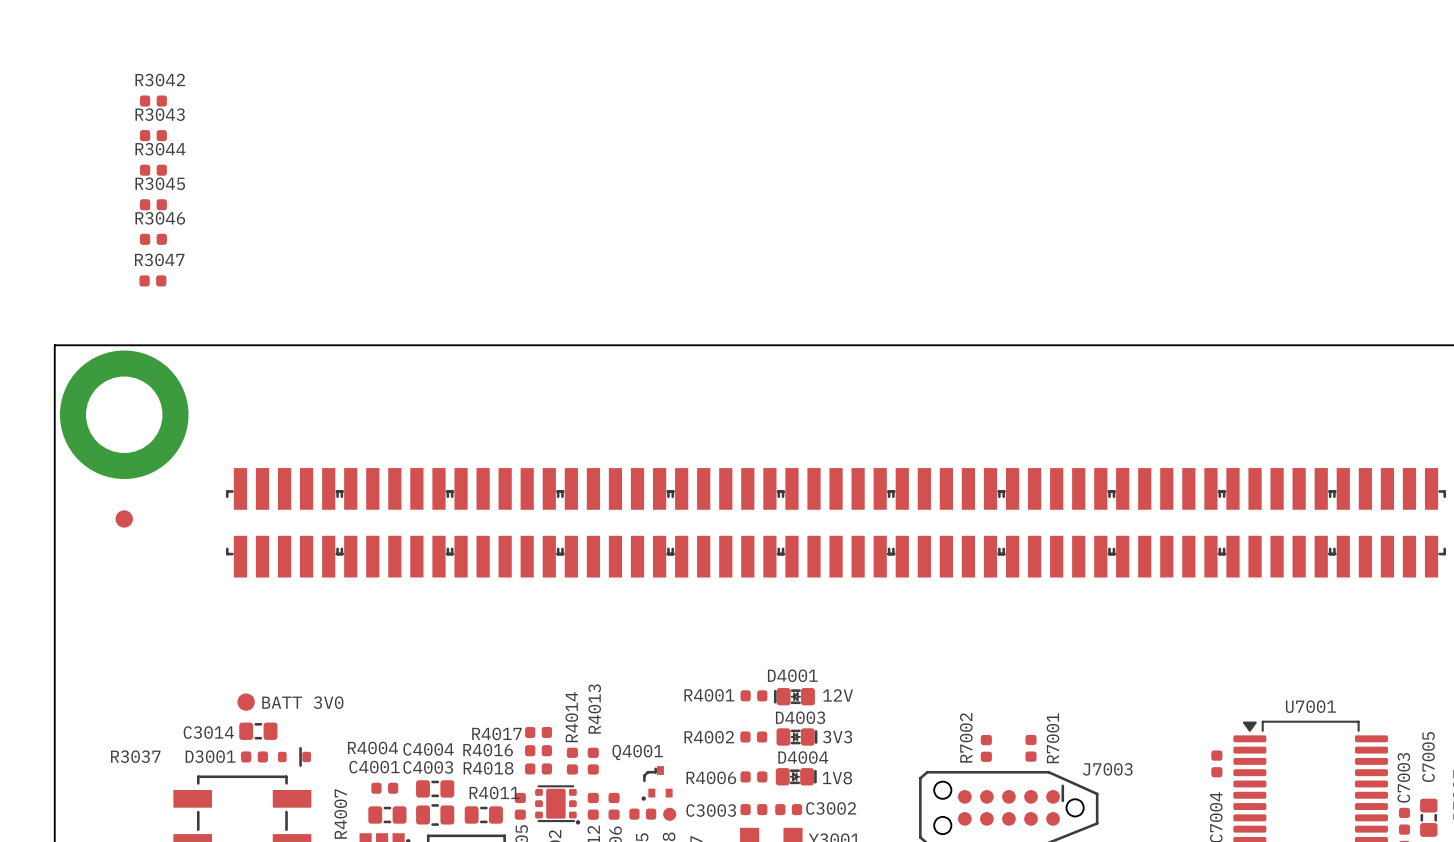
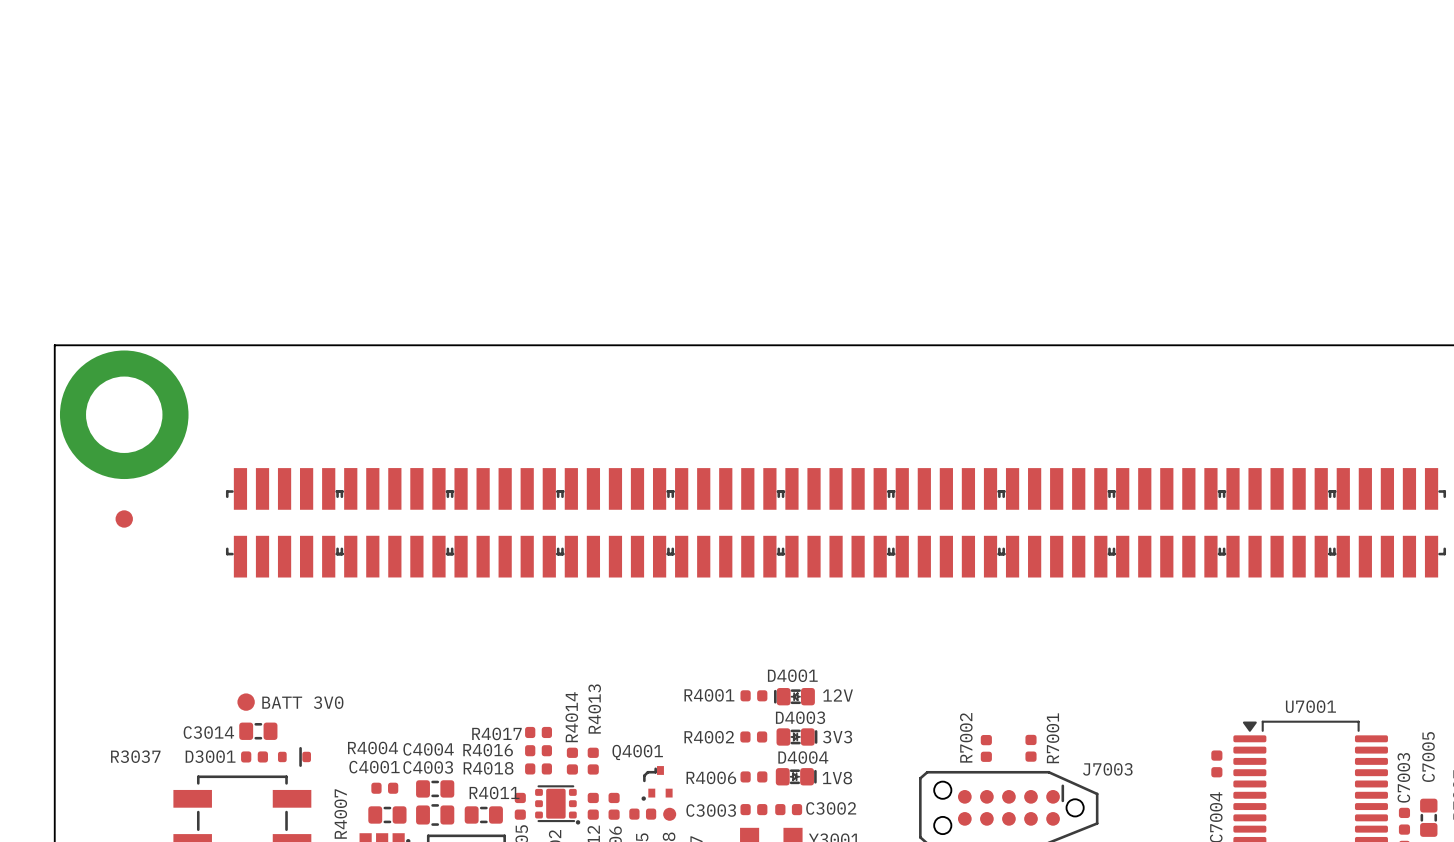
R3042: (153, 101) -> none
R3043: (153, 135) -> none
R3044: (153, 170) -> none
R3045: (153, 204) -> none
R3046: (153, 239) -> none
R3047: (152, 280) -> none

